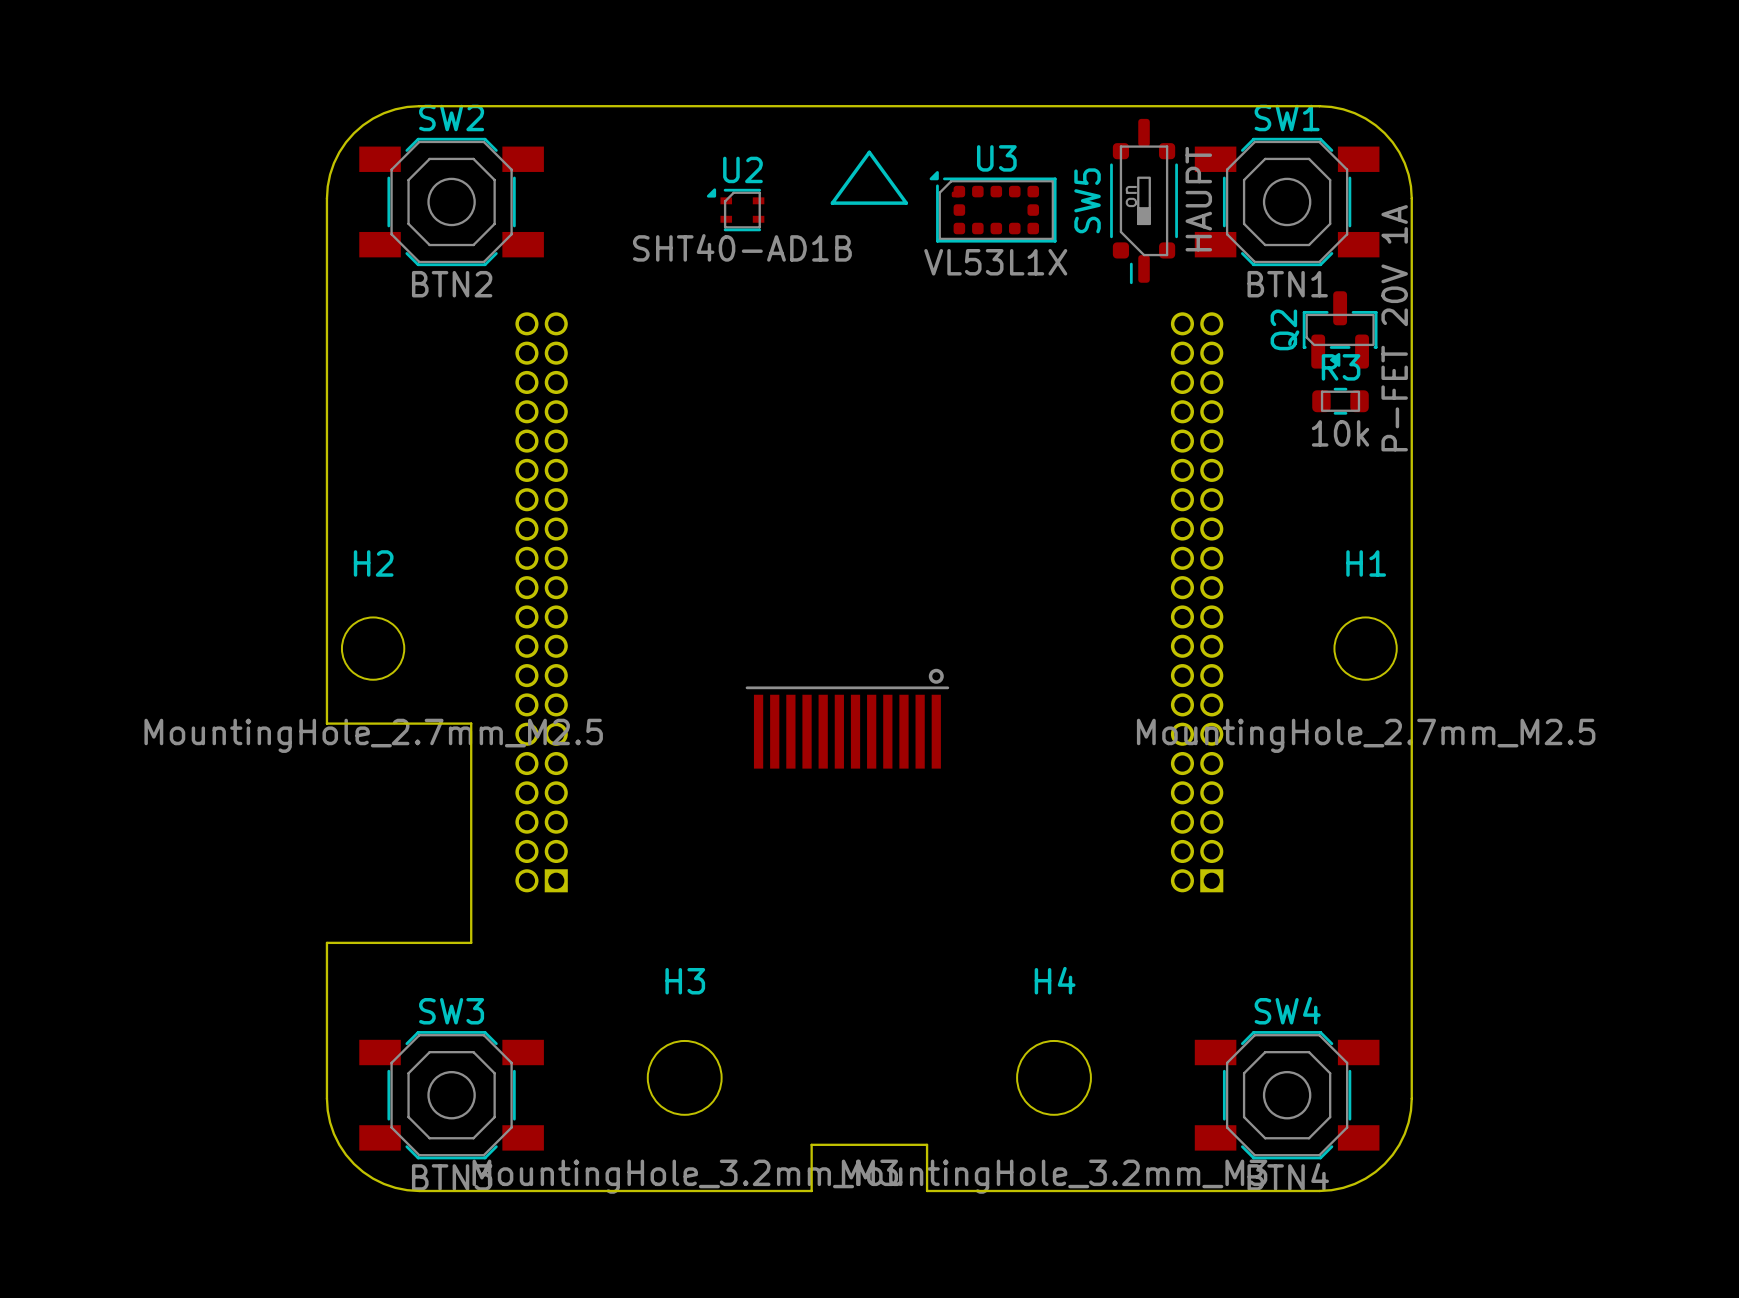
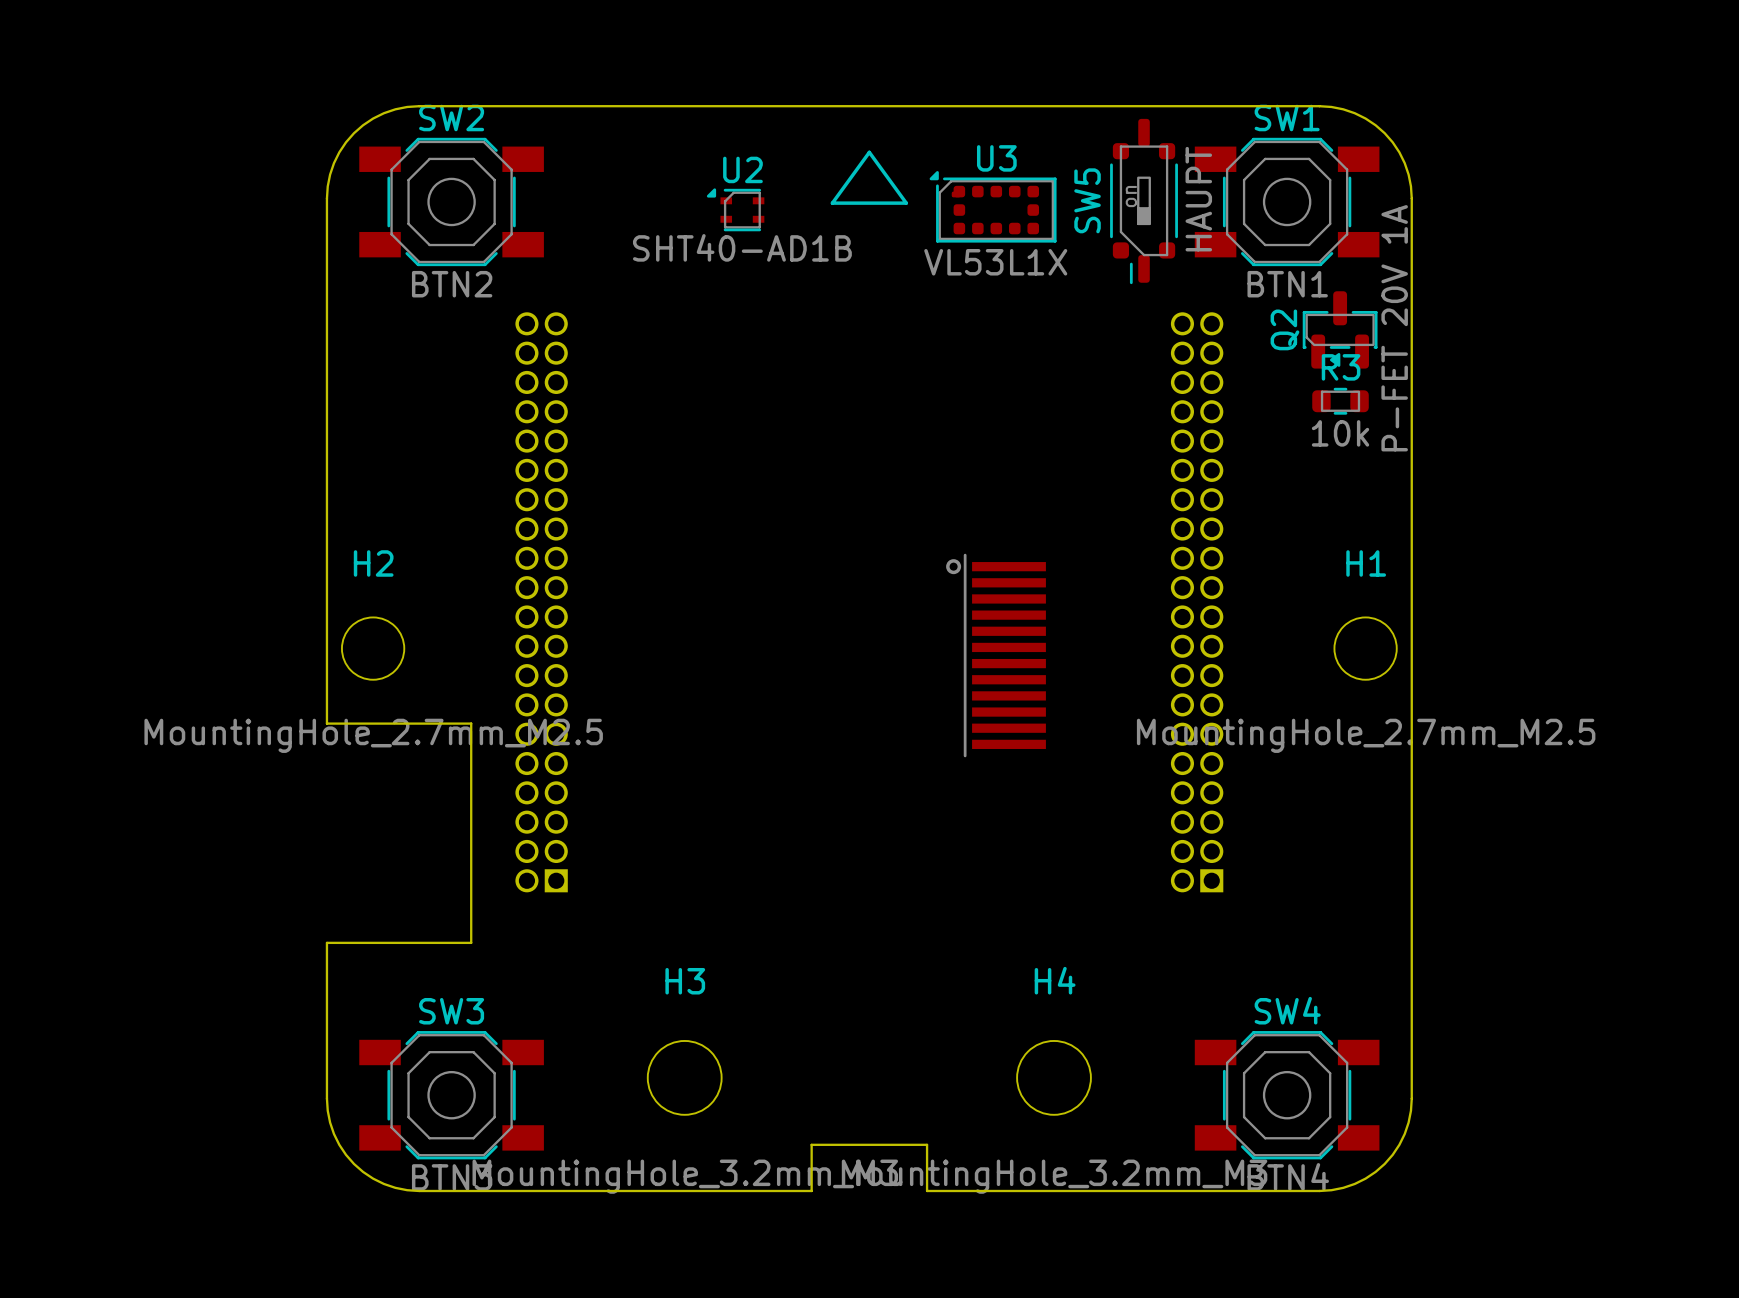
part rotation: 0° (847, 718) -> 90° counterclockwise (996, 655)
part position: (847, 718) -> (996, 655)

